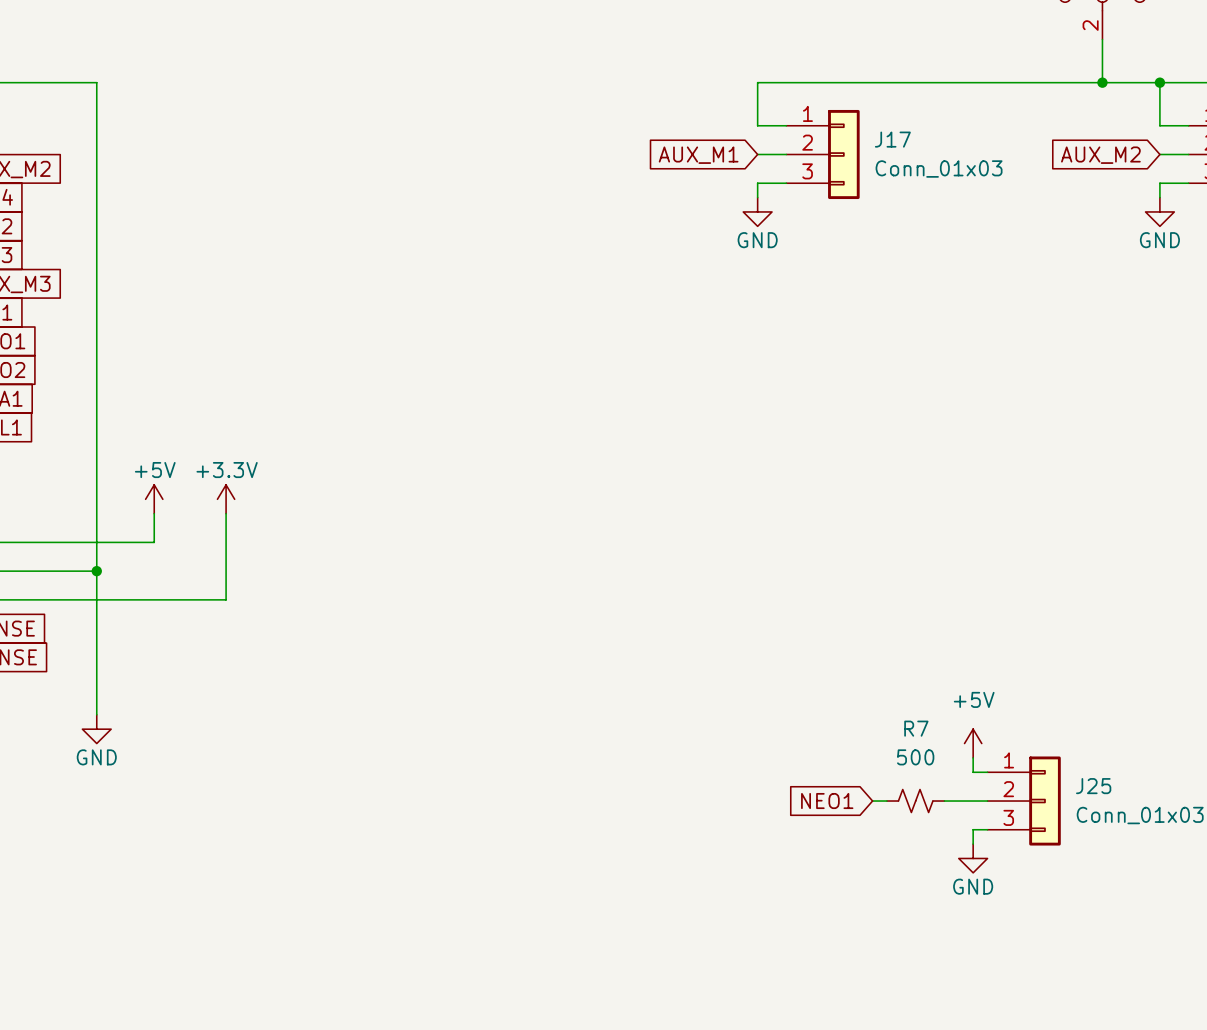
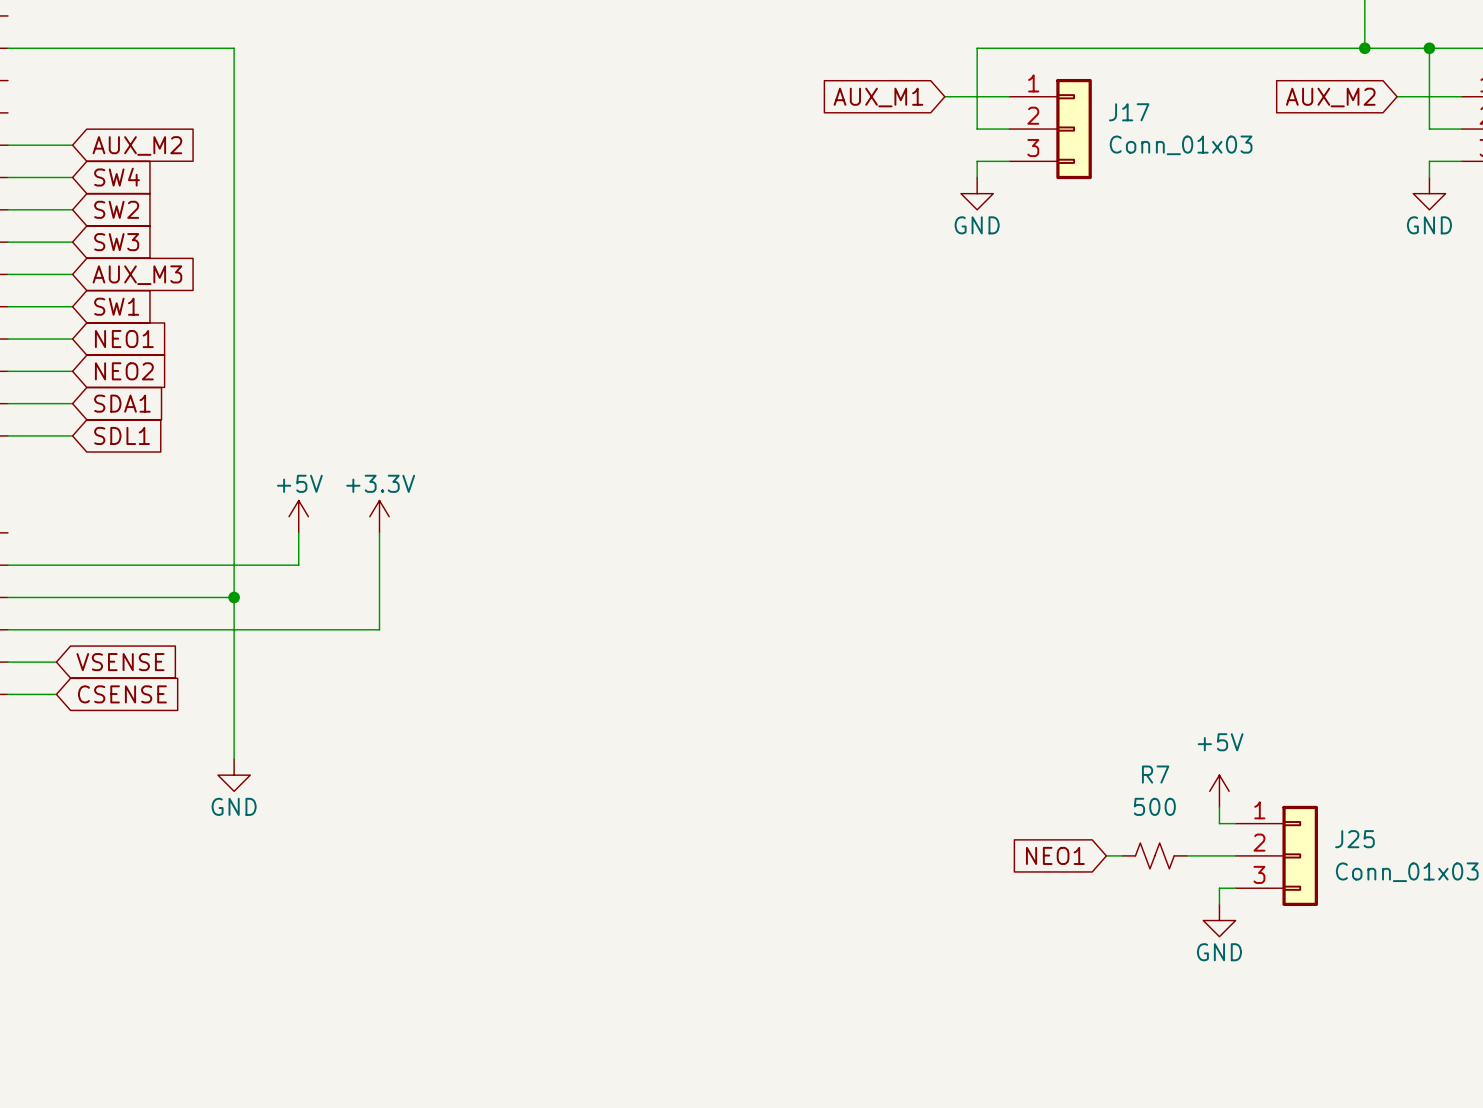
wire: none -> (944, 96) (977, 96) (977, 129)
wire: none -> (1397, 96) (1429, 96) (1429, 129)
global label position: AUX_M1 (698, 155) -> AUX_M1 (878, 97)
global label position: AUX_M2 (1100, 155) -> AUX_M2 (1330, 97)

